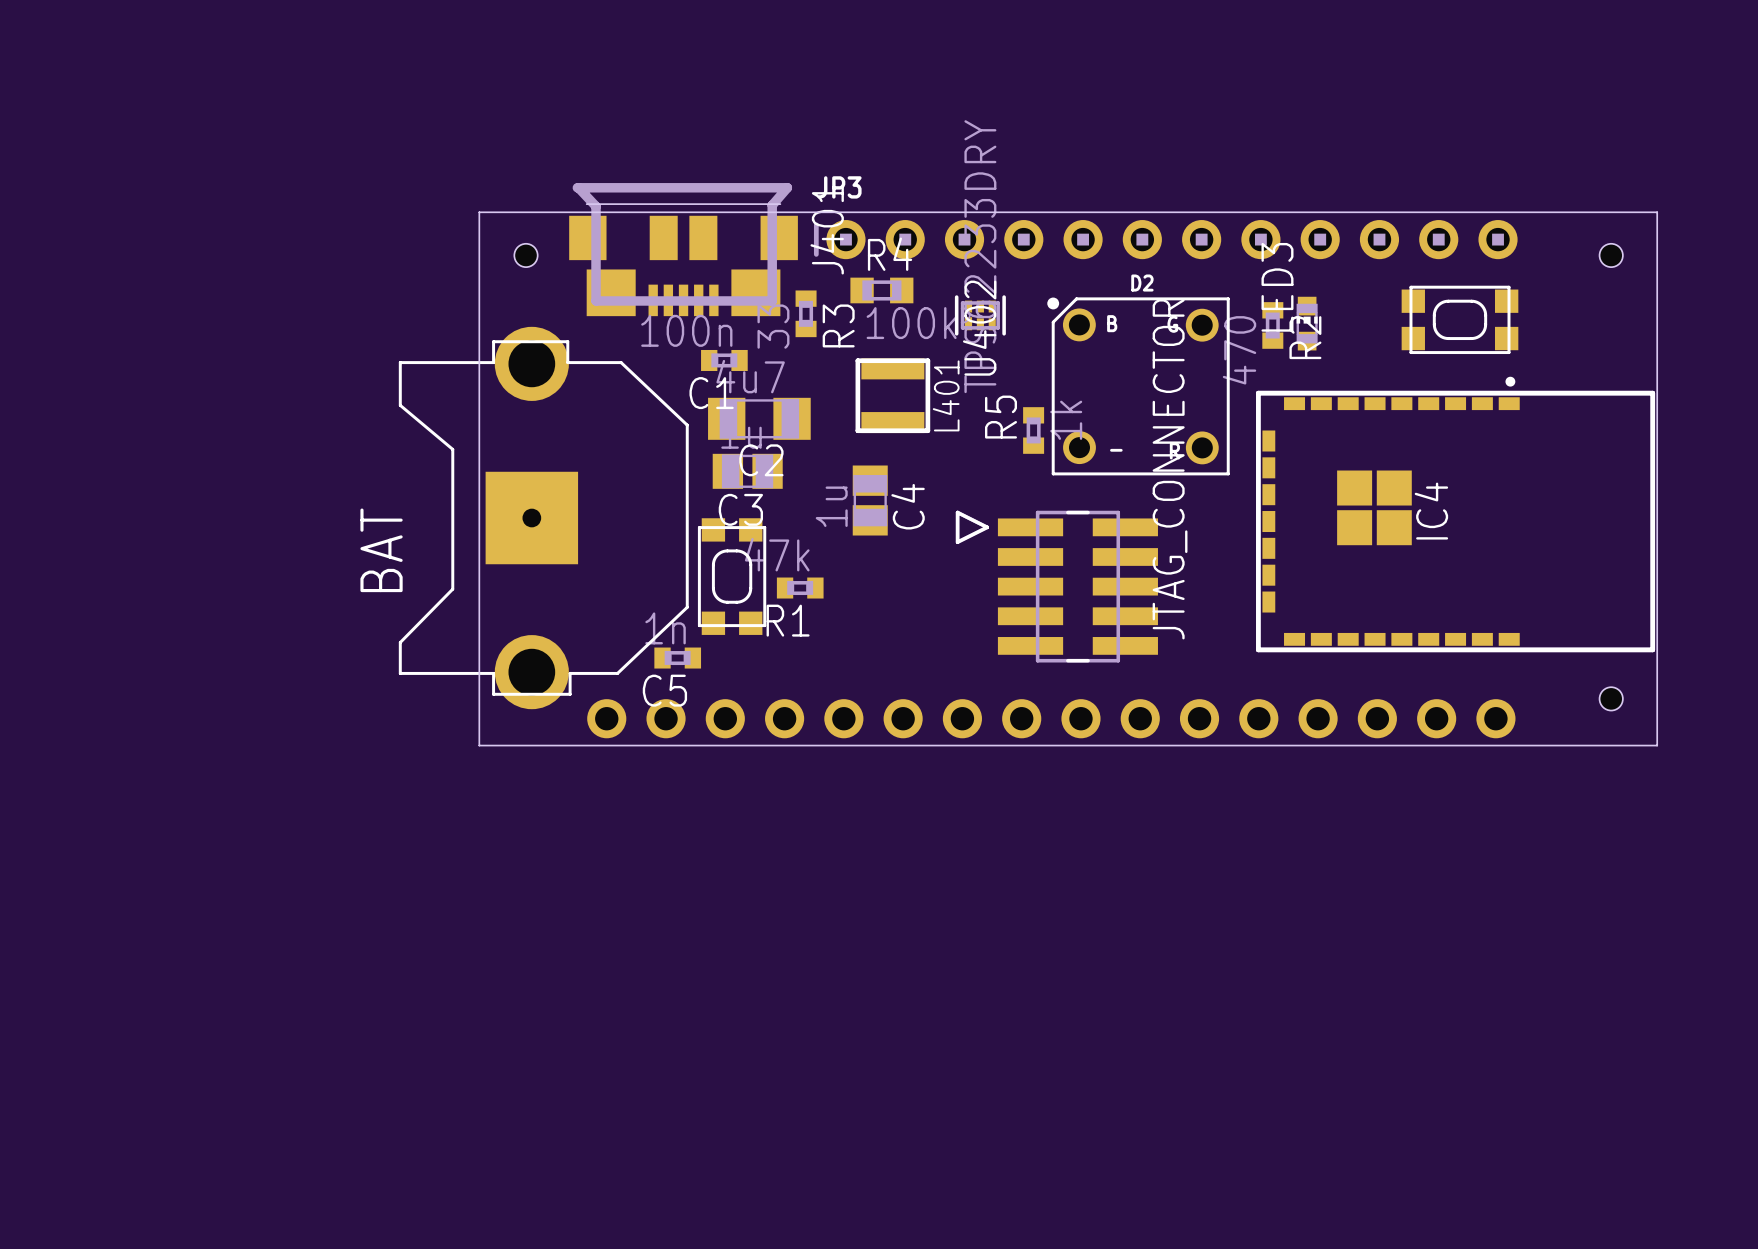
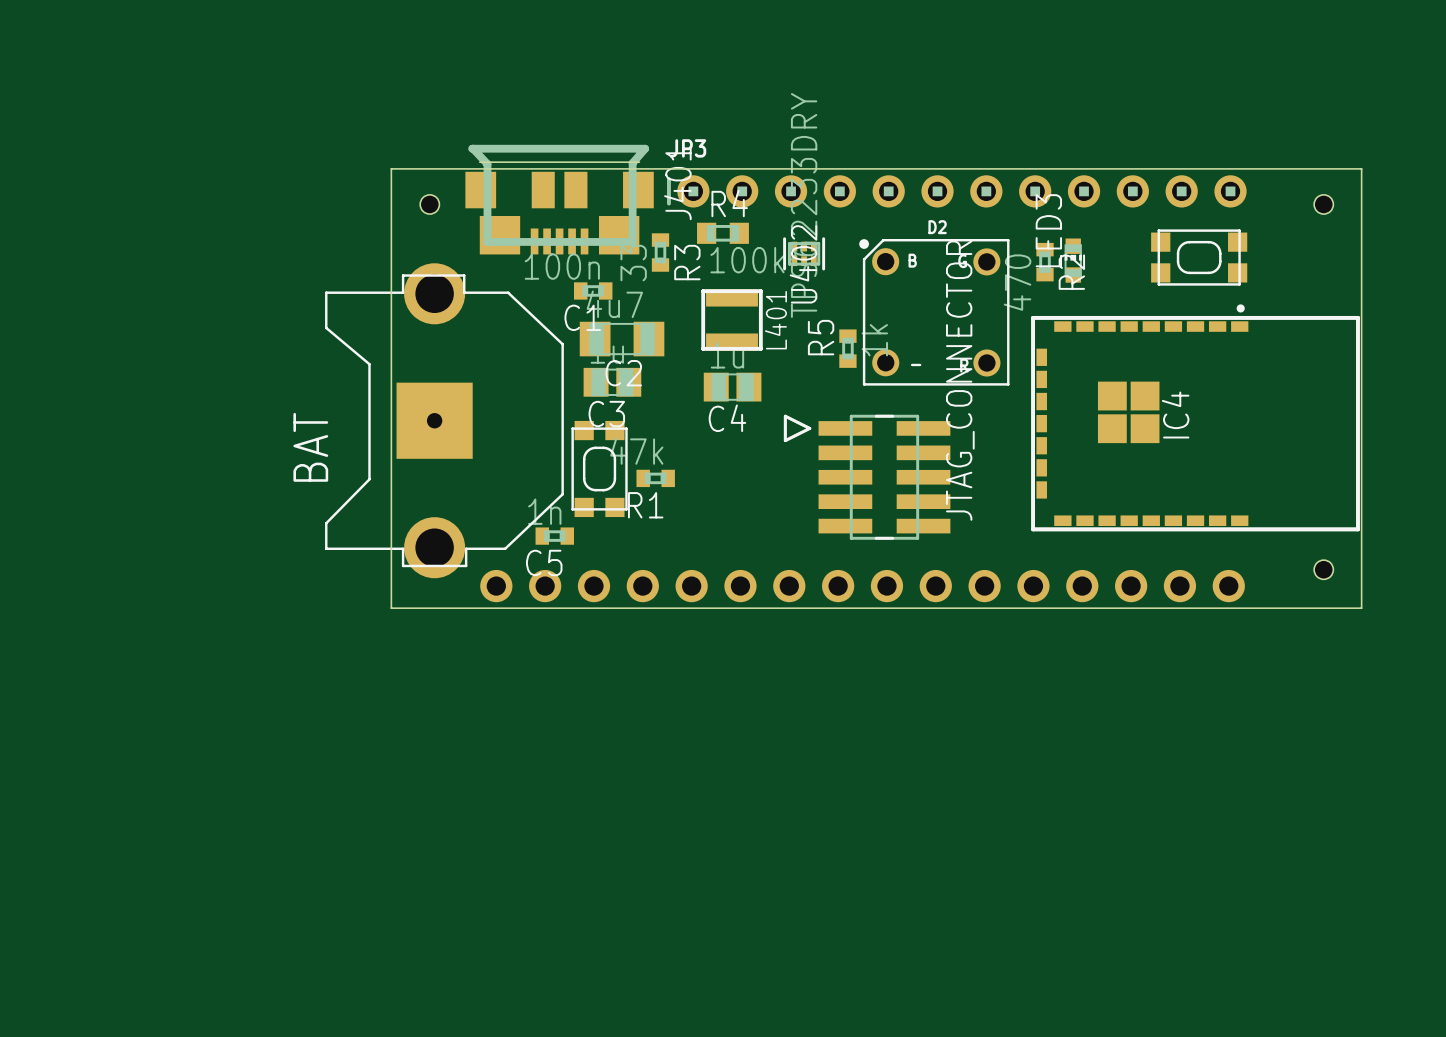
C4 rotation: 0° (870, 500) -> 90° clockwise (732, 387)

